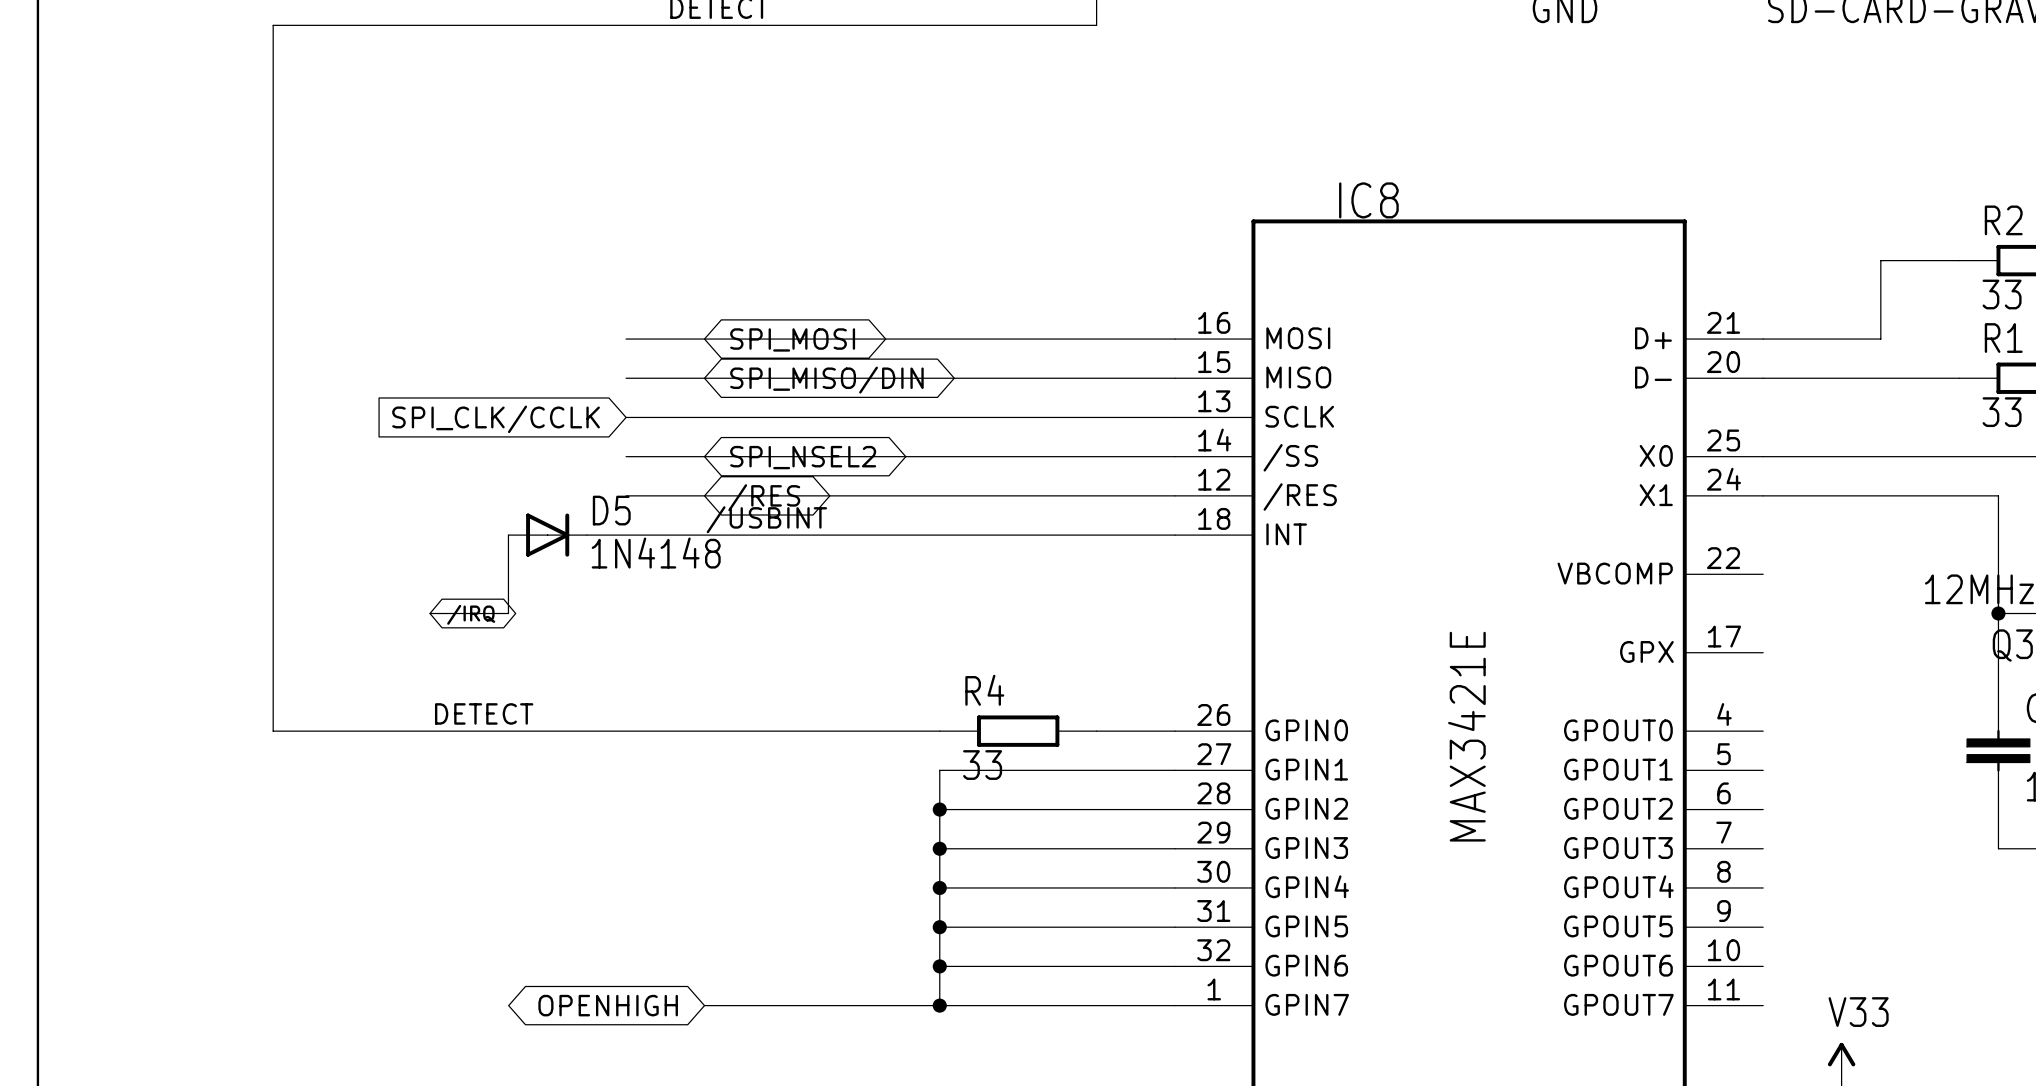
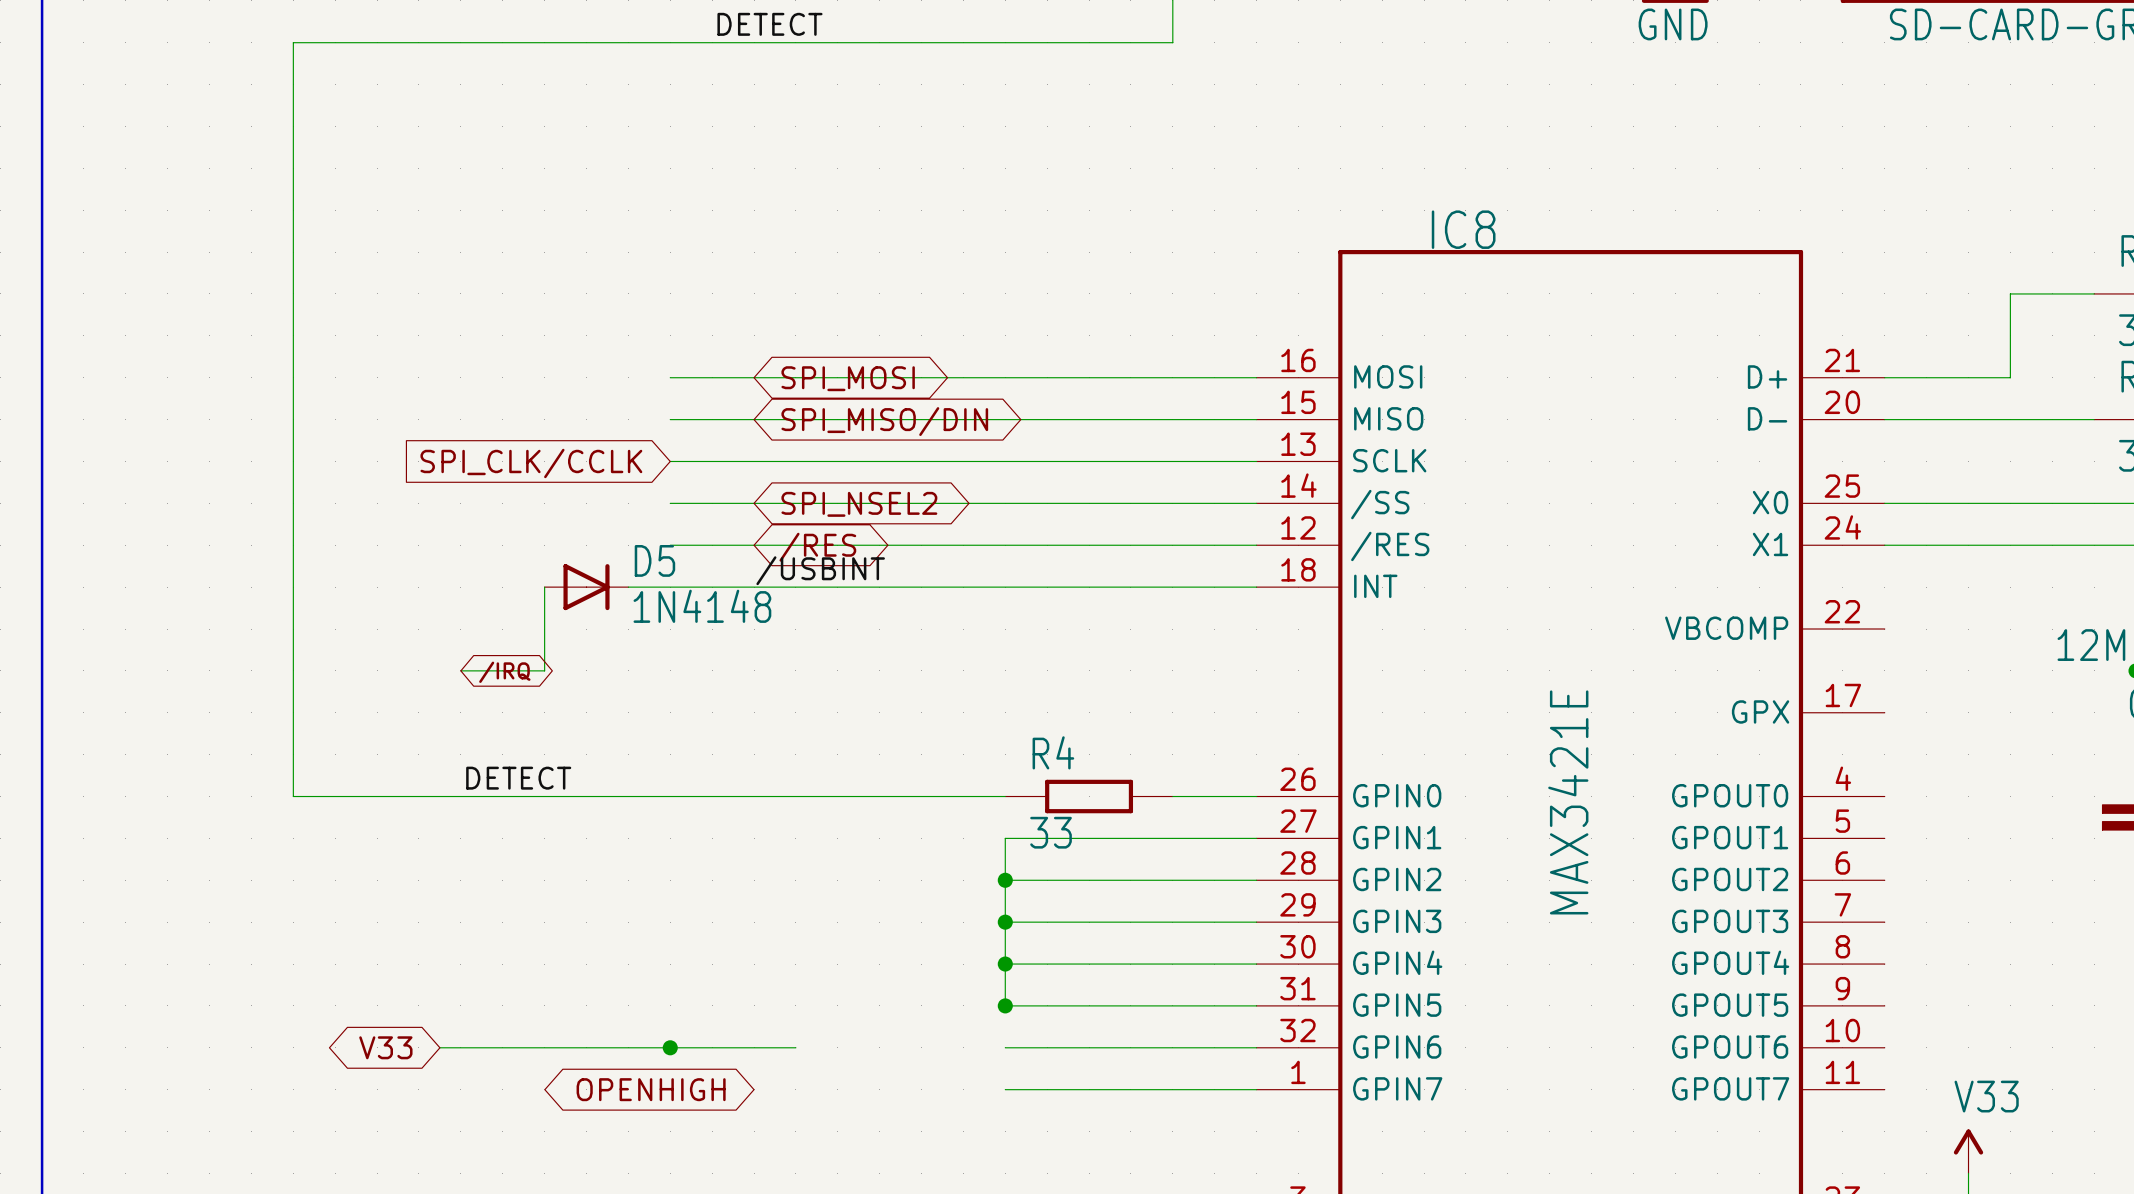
wire: (939, 927) (939, 1005) (704, 1005) -> none
global label: none -> V33 (385, 1047)
wire: none -> (439, 1047) (795, 1047)
junction: none -> (670, 1047)
junction: (939, 966) -> none
junction: (939, 1005) -> none

